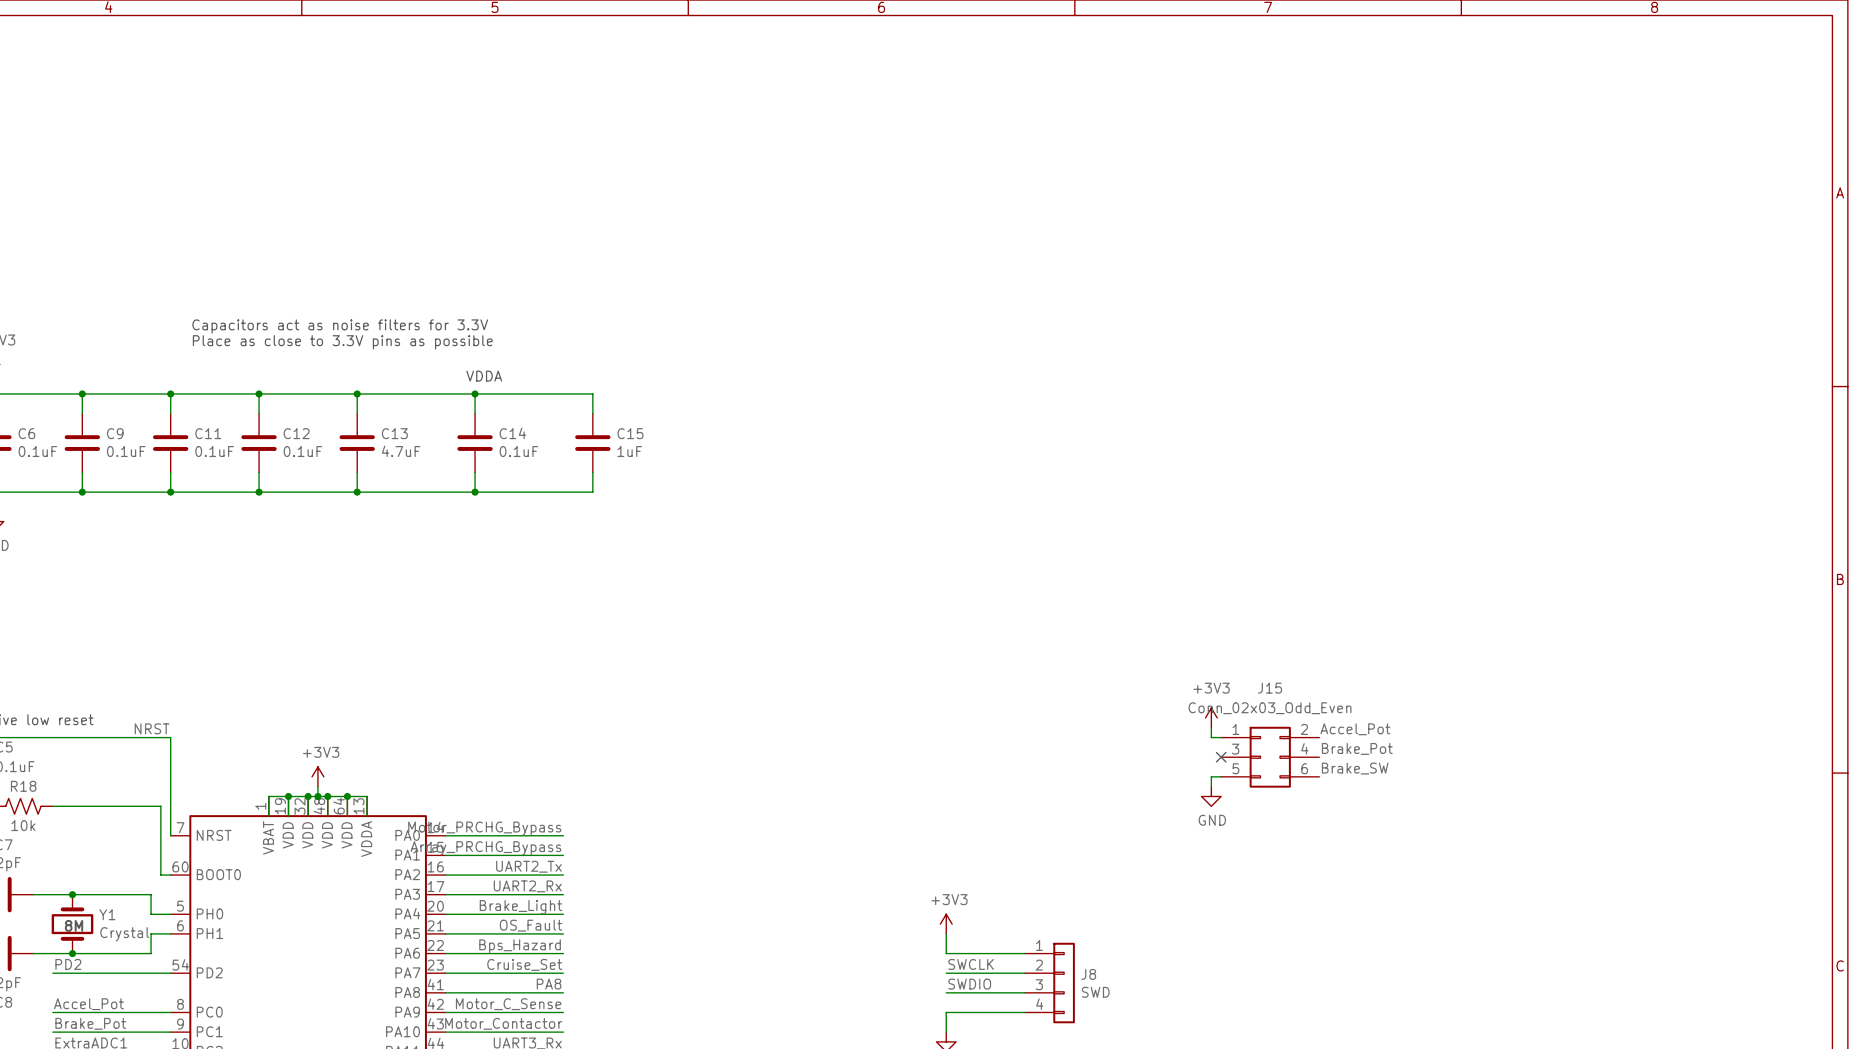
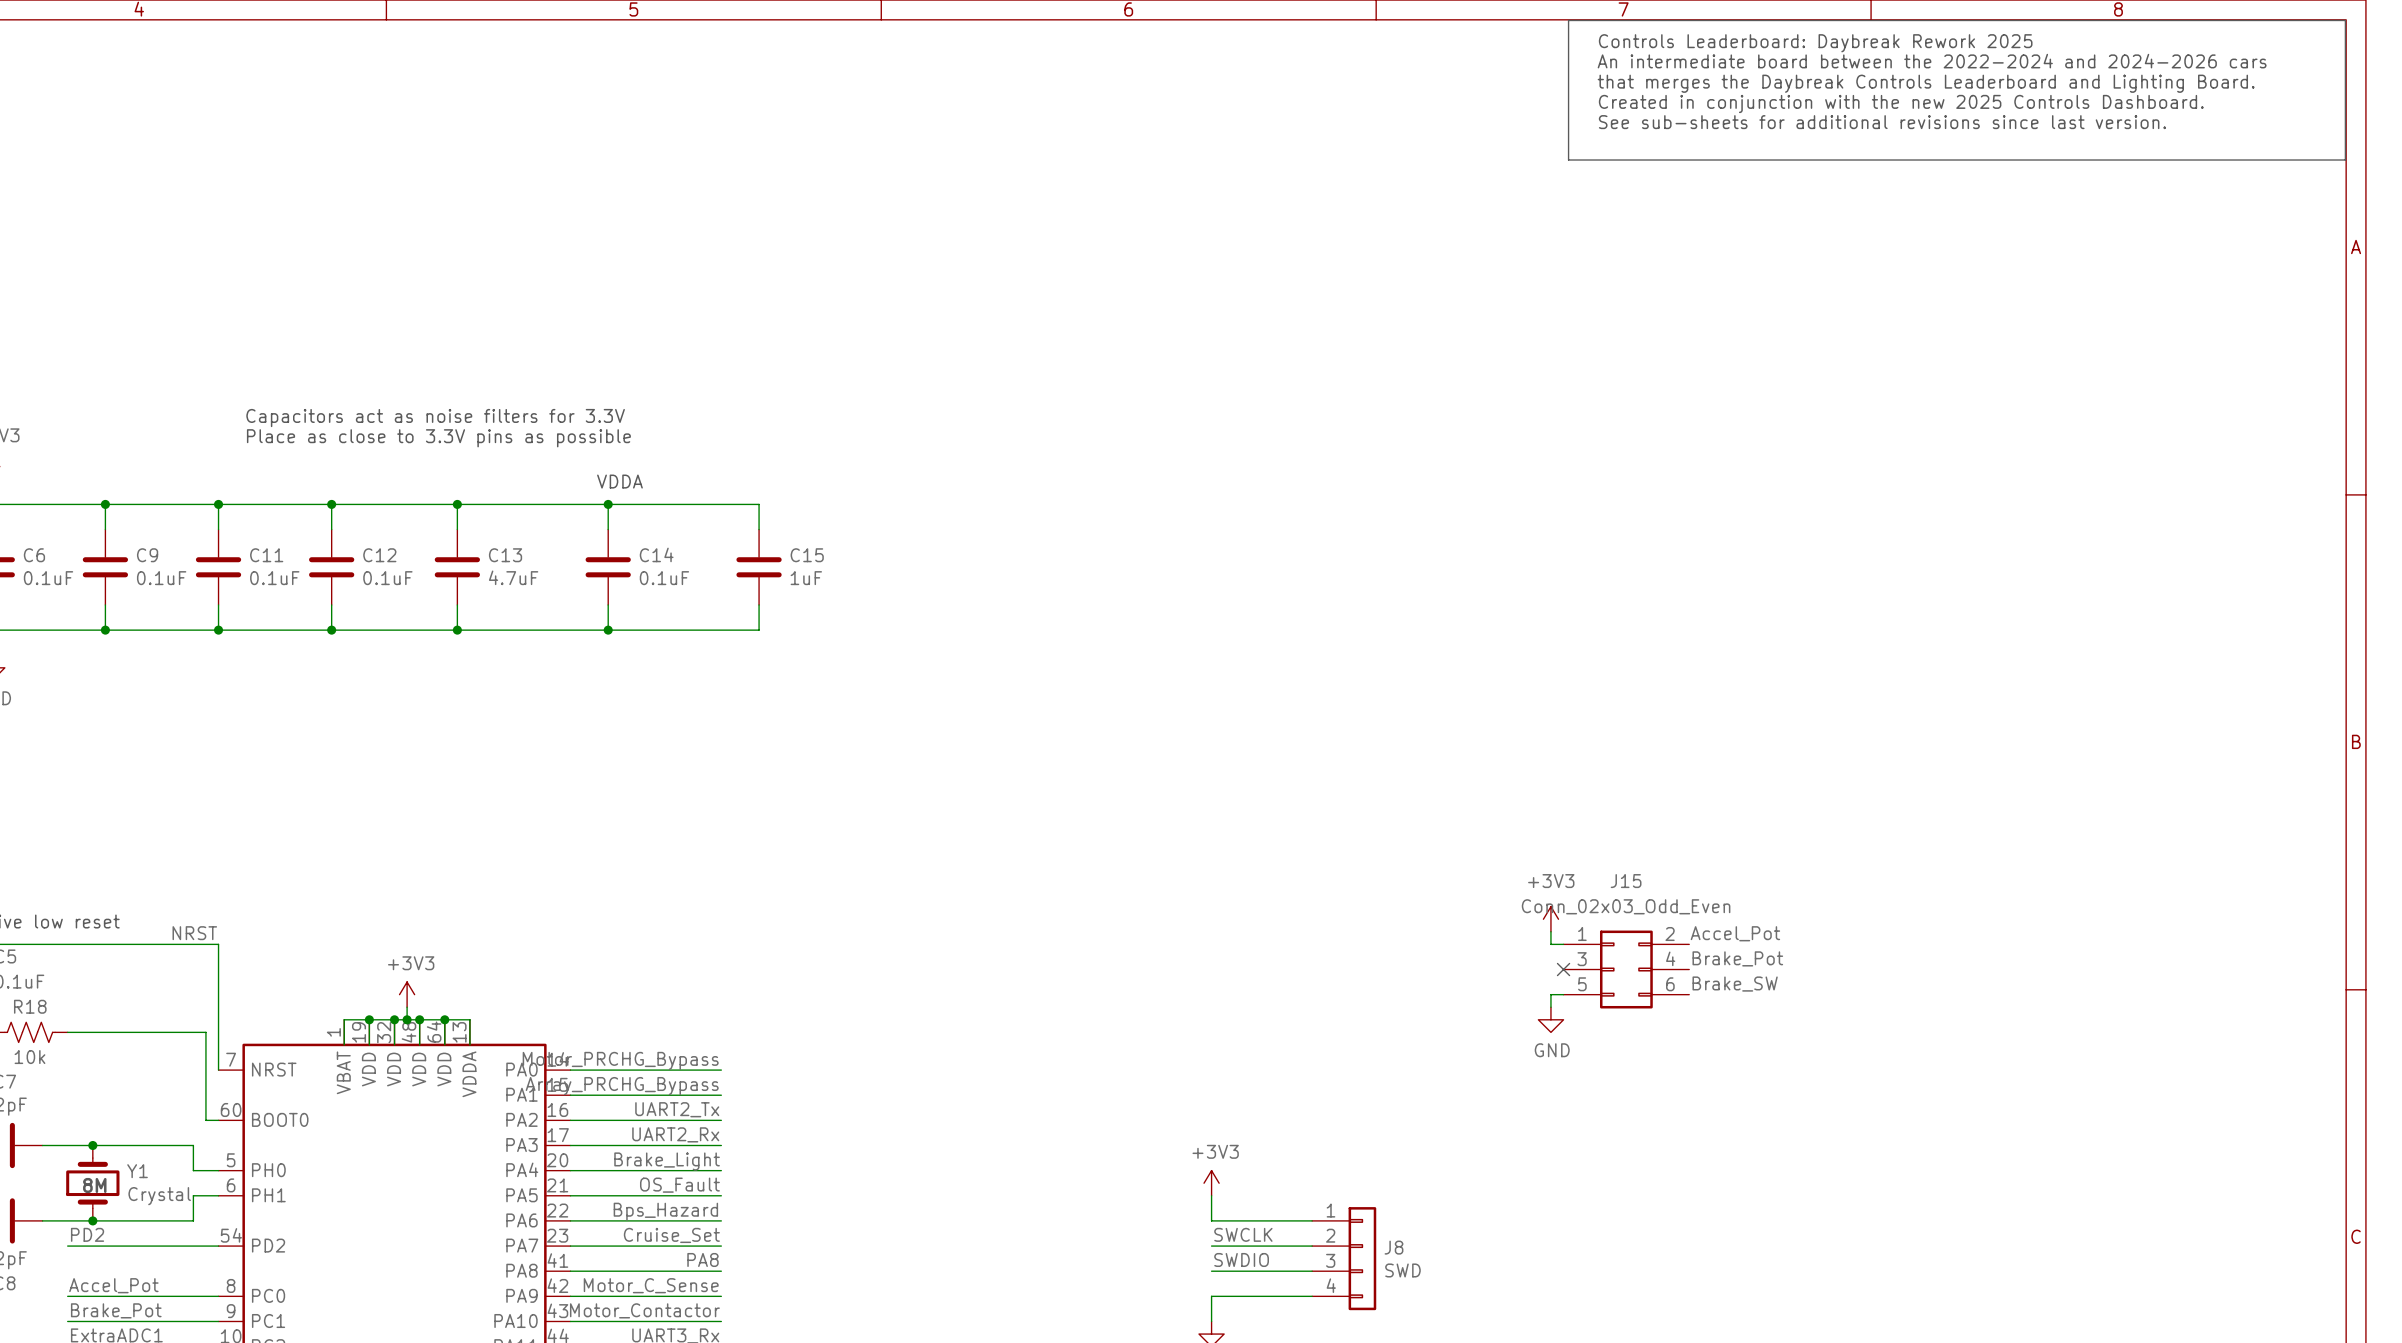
line: none -> (1568, 20) (2345, 20) (2345, 160) (1568, 160) (1568, 20)
text: none -> Controls Leaderboard: Daybreak Rework 2025 (1815, 43)
text: none -> An intermediate board between the 2022-2024 and 2024-2026 cars (1932, 61)
text: none -> that merges the Daybreak Controls Leaderboard and Lighting Board. (1926, 83)
text: none -> Created in conjunction with the new 2025 Controls Dashboard. (1901, 103)
text: none -> See sub-sheets for additional revisions since last version. (1882, 122)

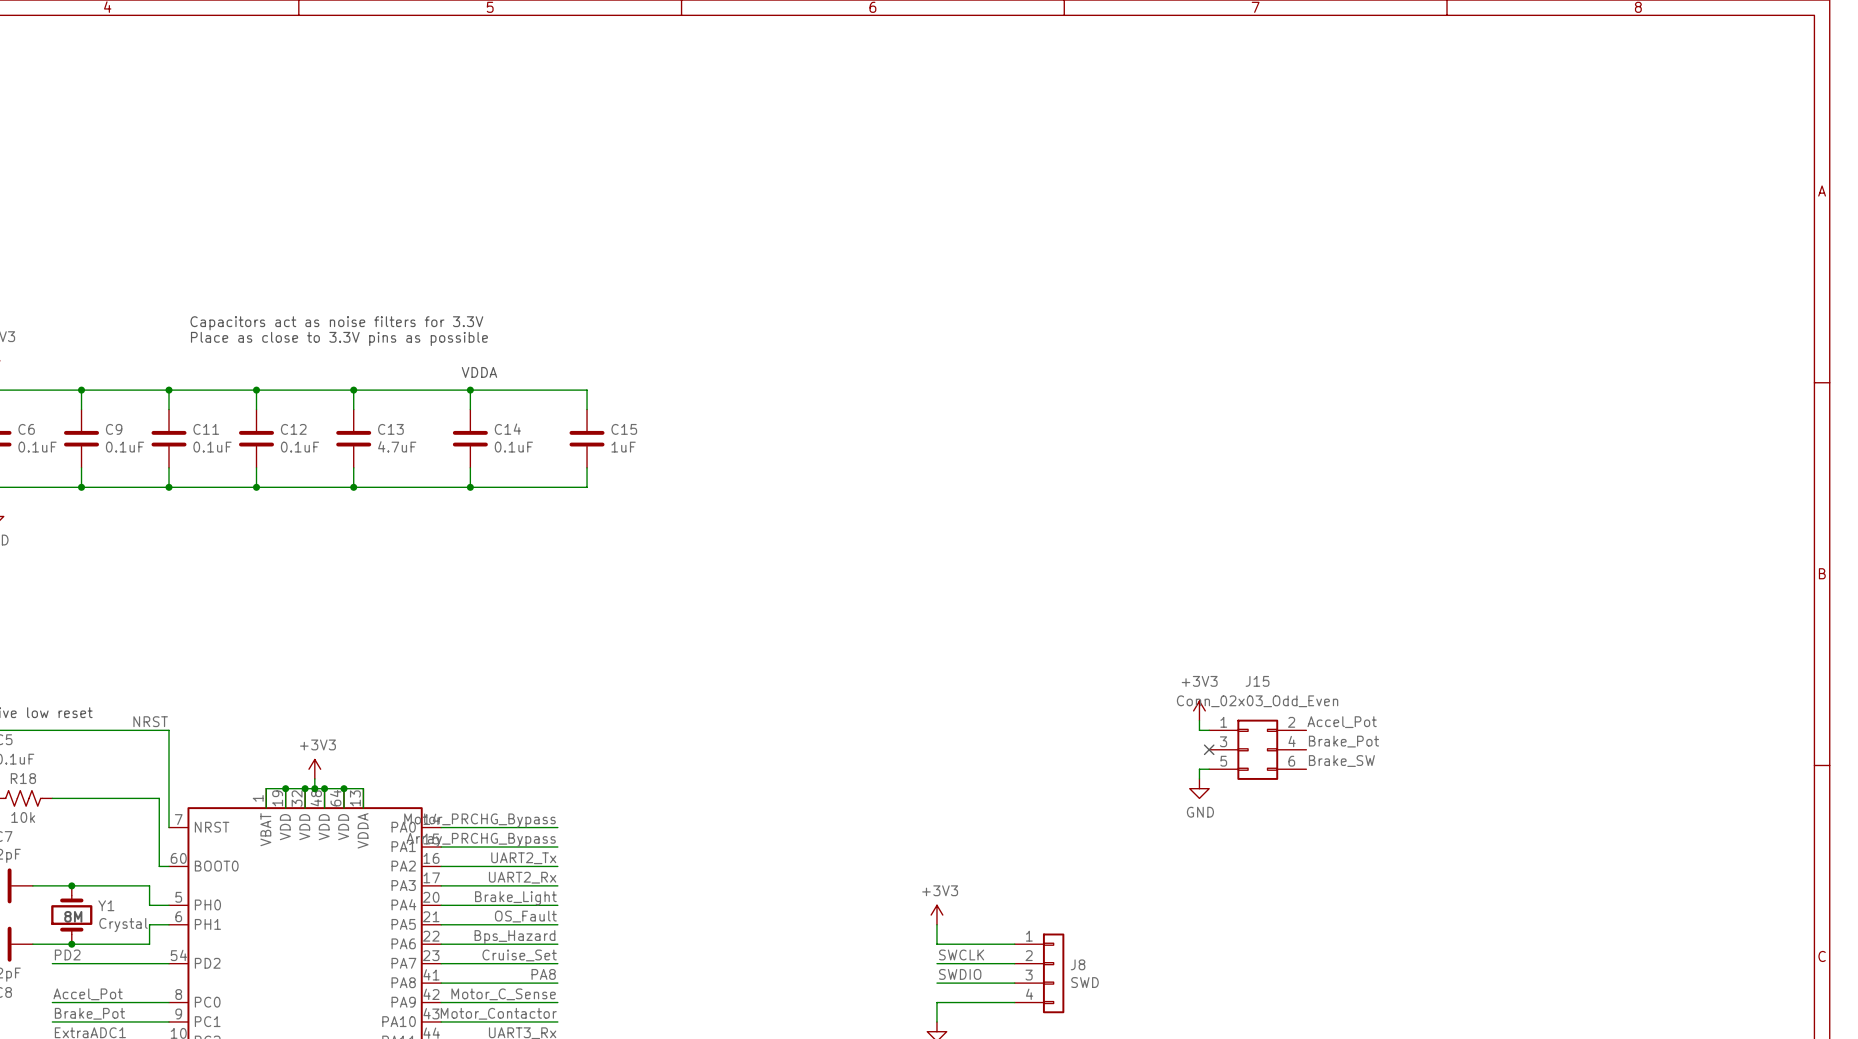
line: (1568, 20) (2345, 20) (2345, 160) (1568, 160) (1568, 20) -> none
text: Controls Leaderboard: Daybreak Rework 2025 (1815, 43) -> none
text: An intermediate board between the 2022-2024 and 2024-2026 cars (1932, 61) -> none
text: that merges the Daybreak Controls Leaderboard and Lighting Board. (1926, 83) -> none
text: Created in conjunction with the new 2025 Controls Dashboard. (1901, 103) -> none
text: See sub-sheets for additional revisions since last version. (1882, 122) -> none

